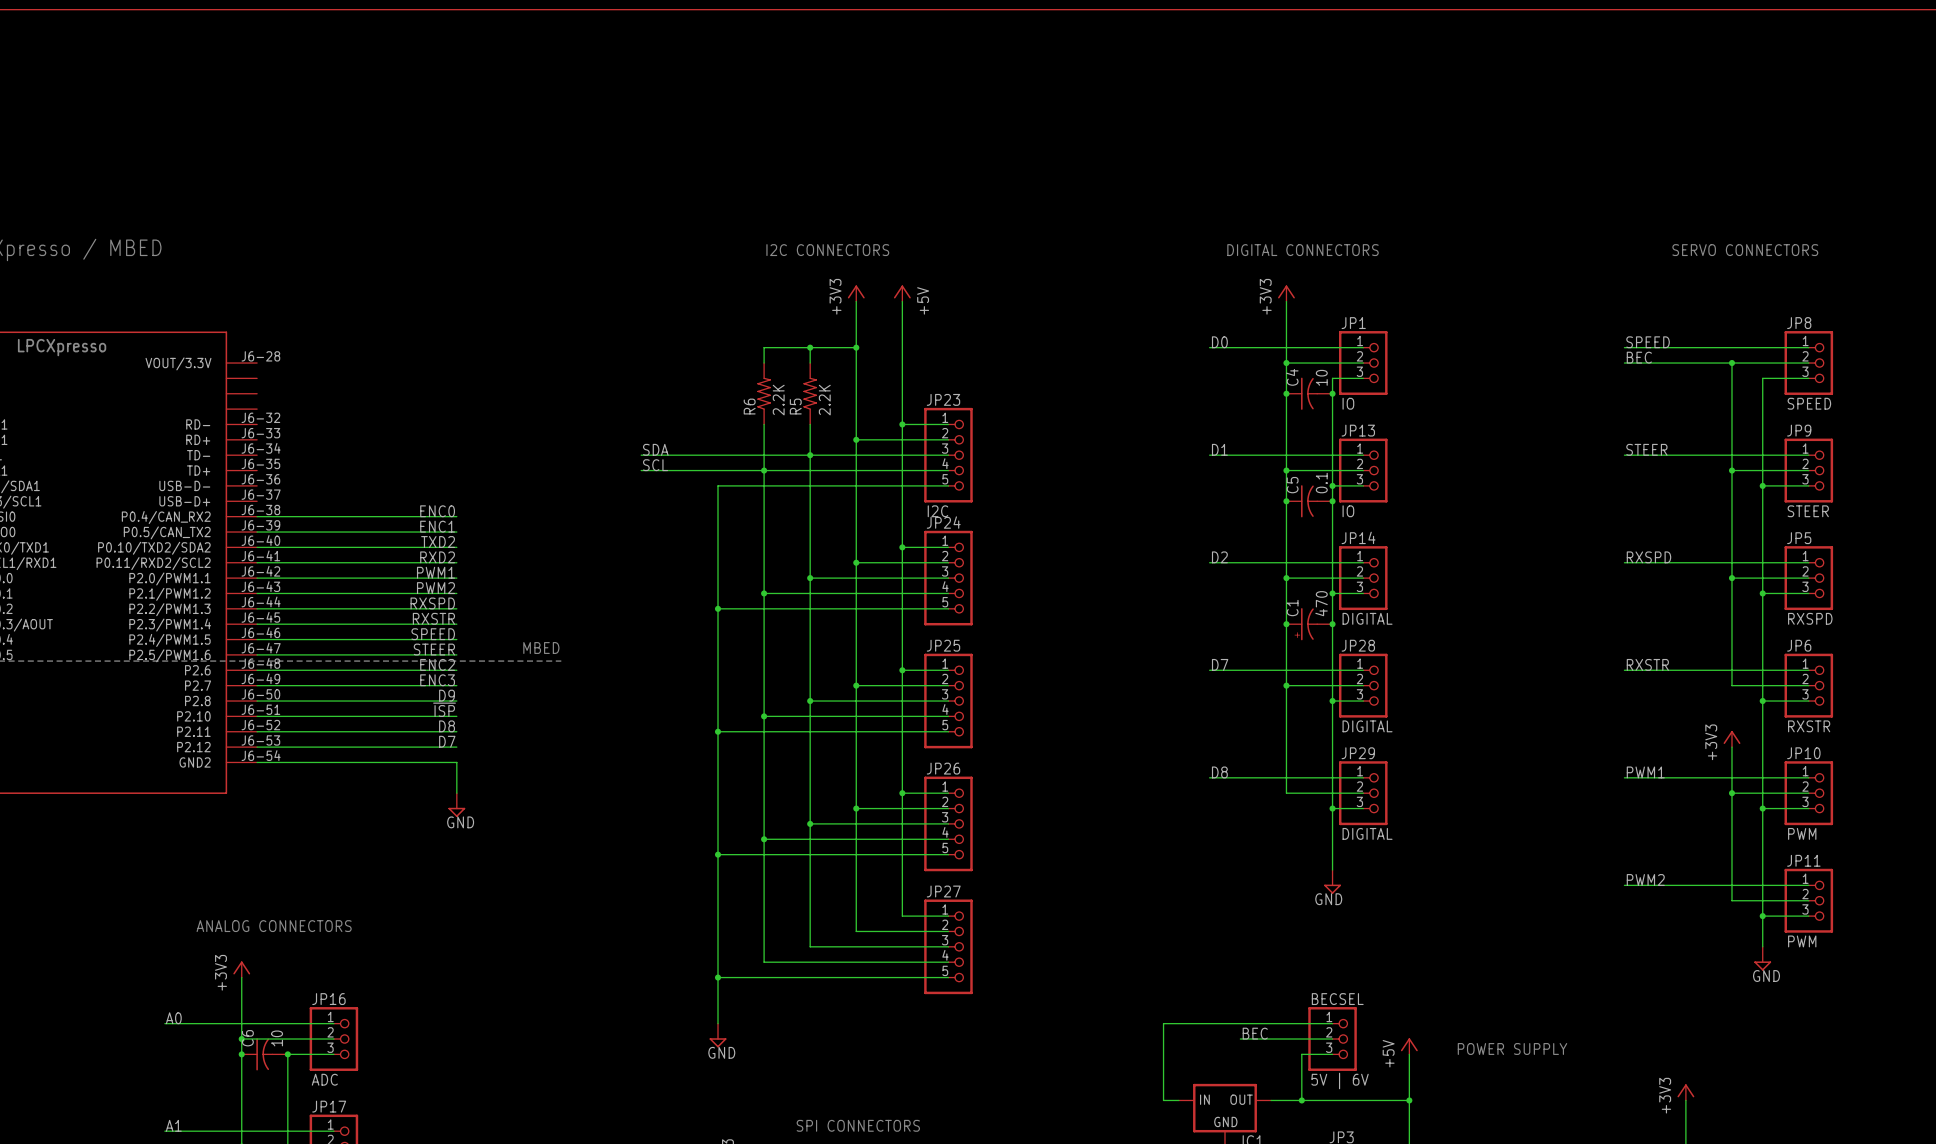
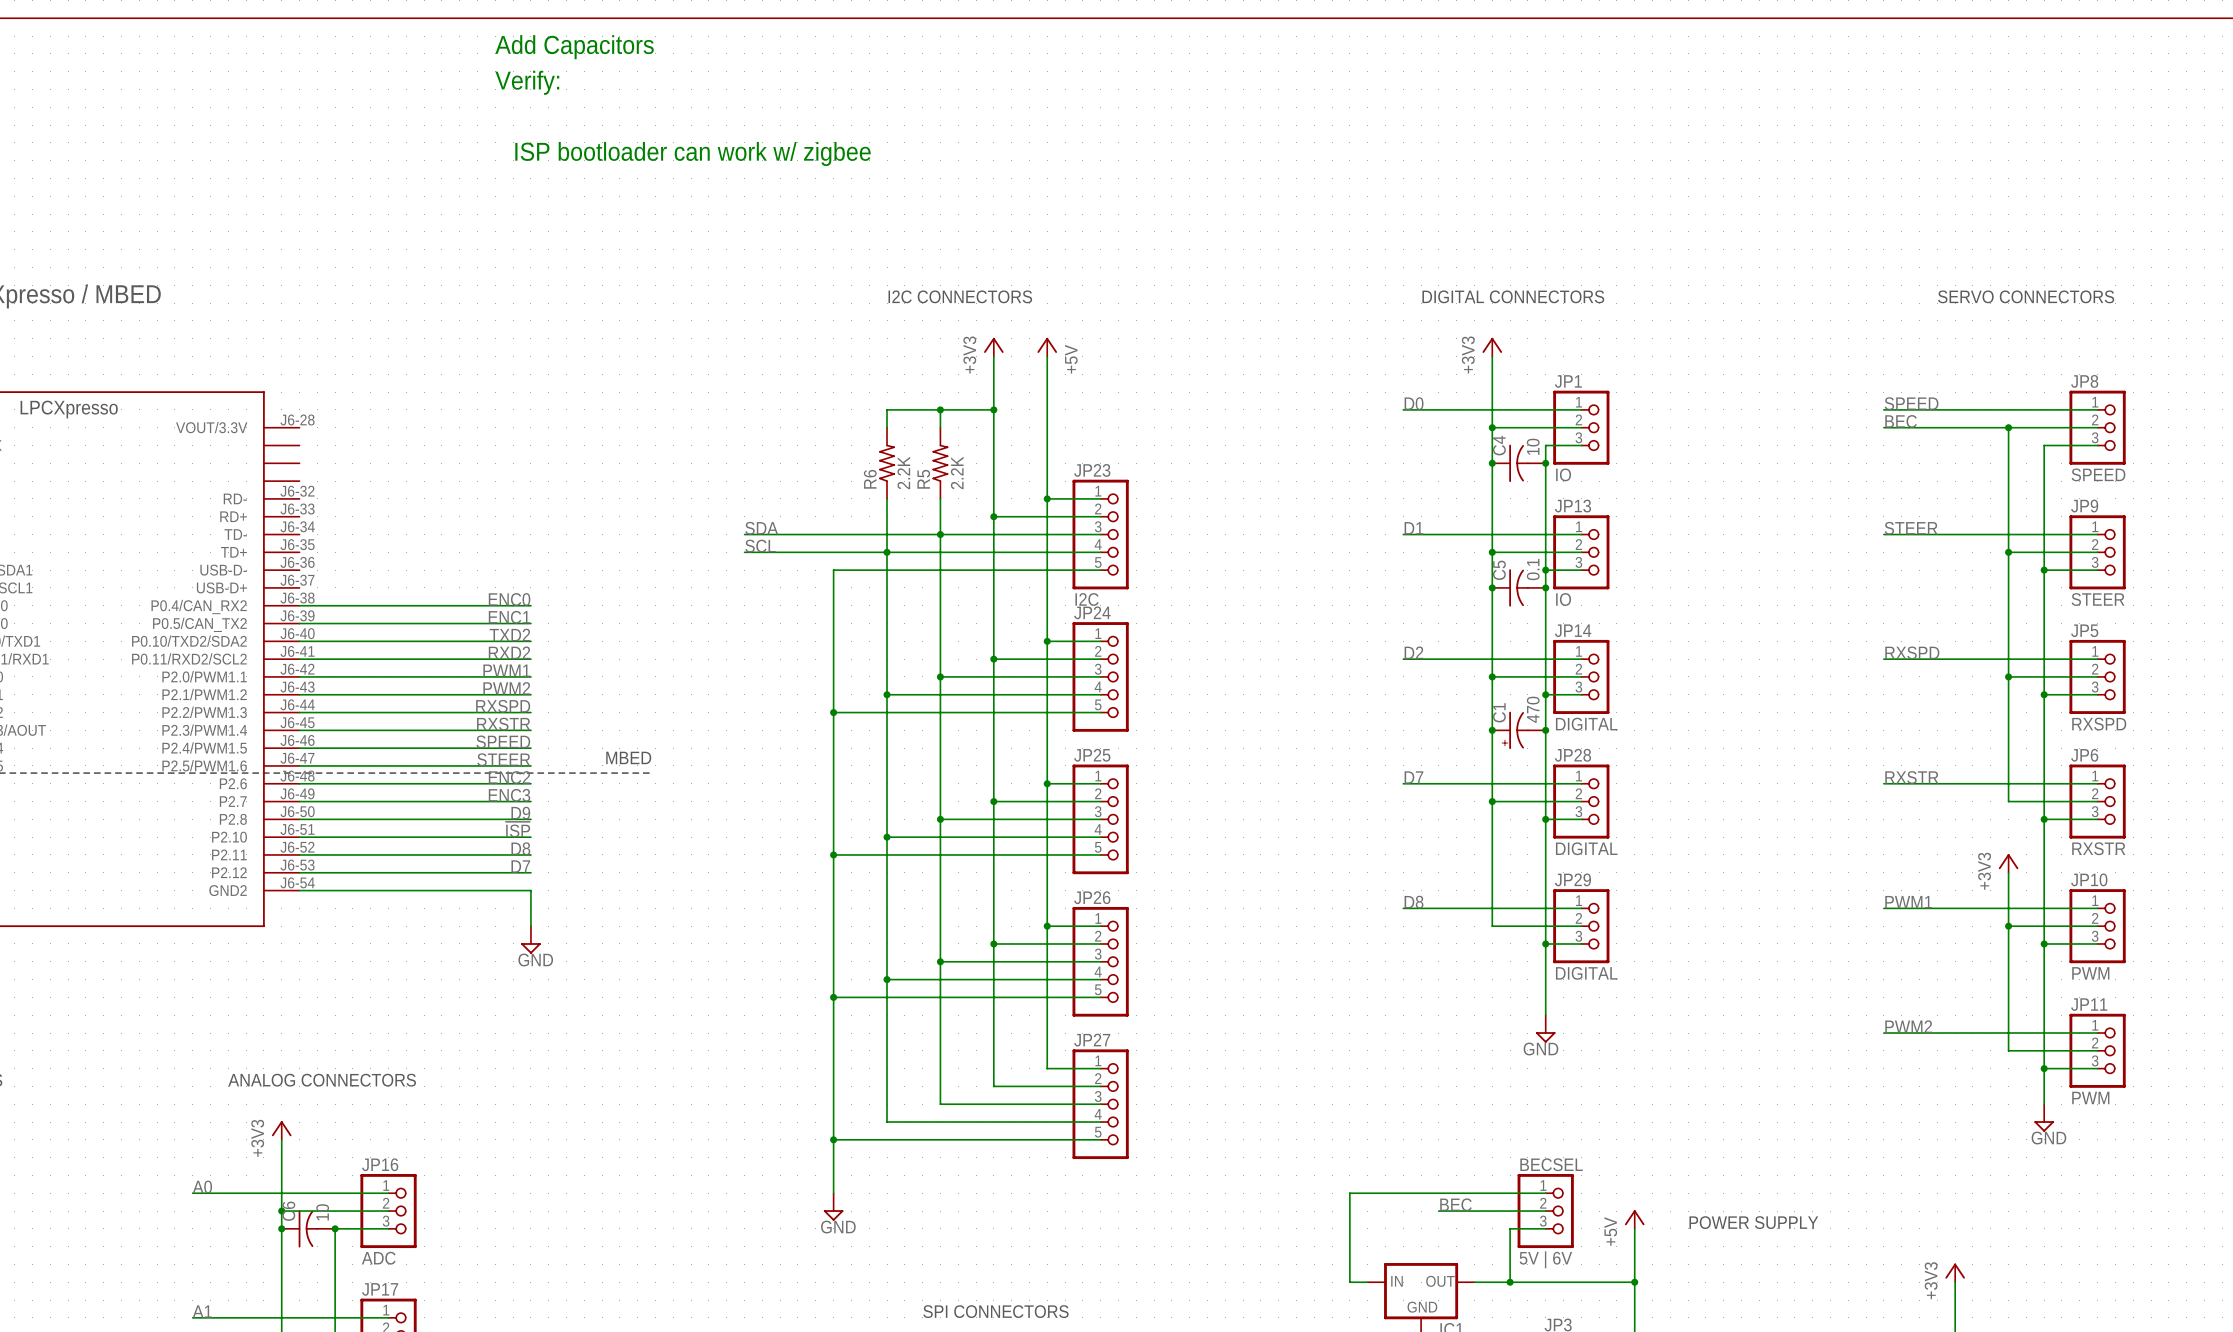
text: none -> Add Capacitors (574, 47)
text: none -> Verify: (527, 82)
text: none -> ISP bootloader can work w/ zigbee (693, 153)

